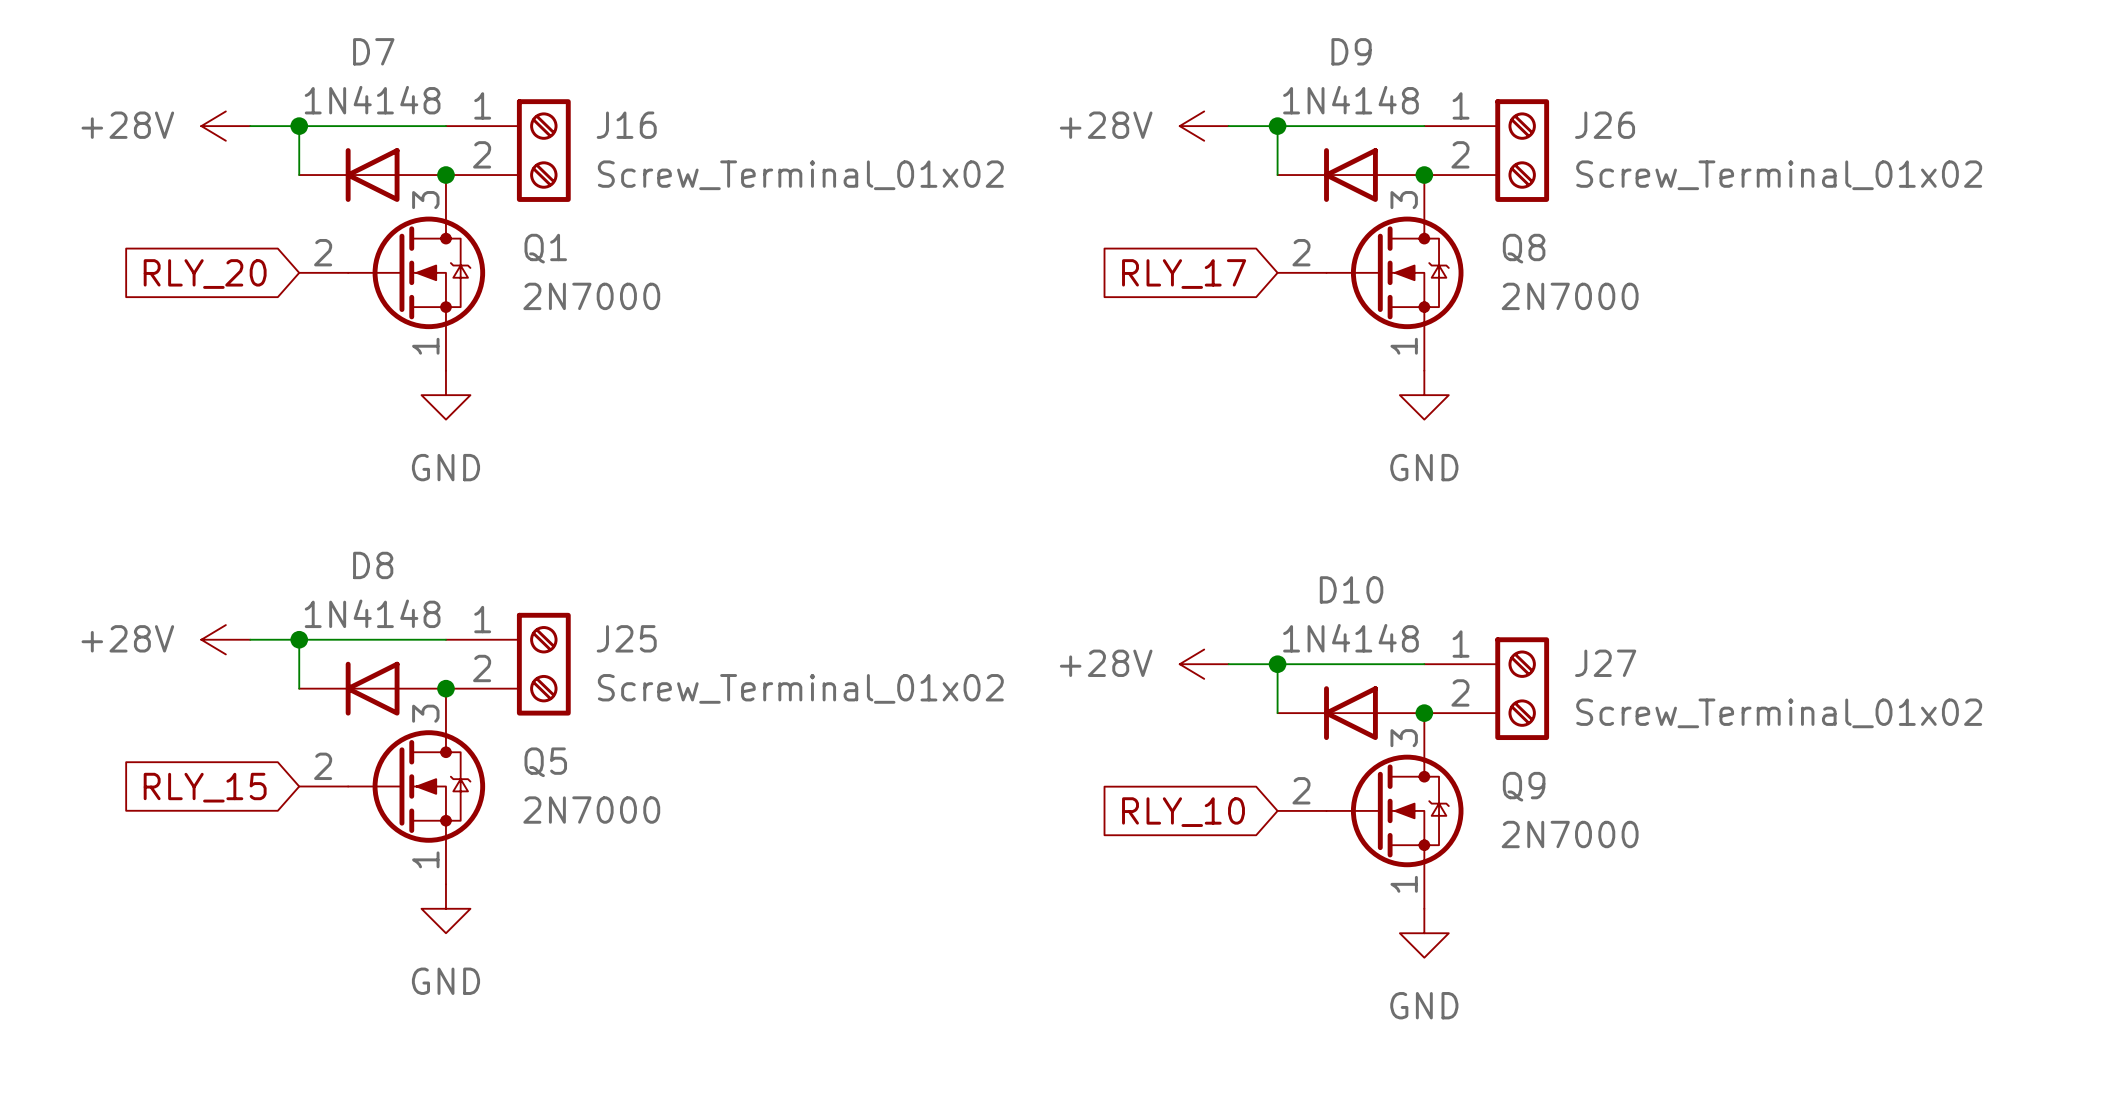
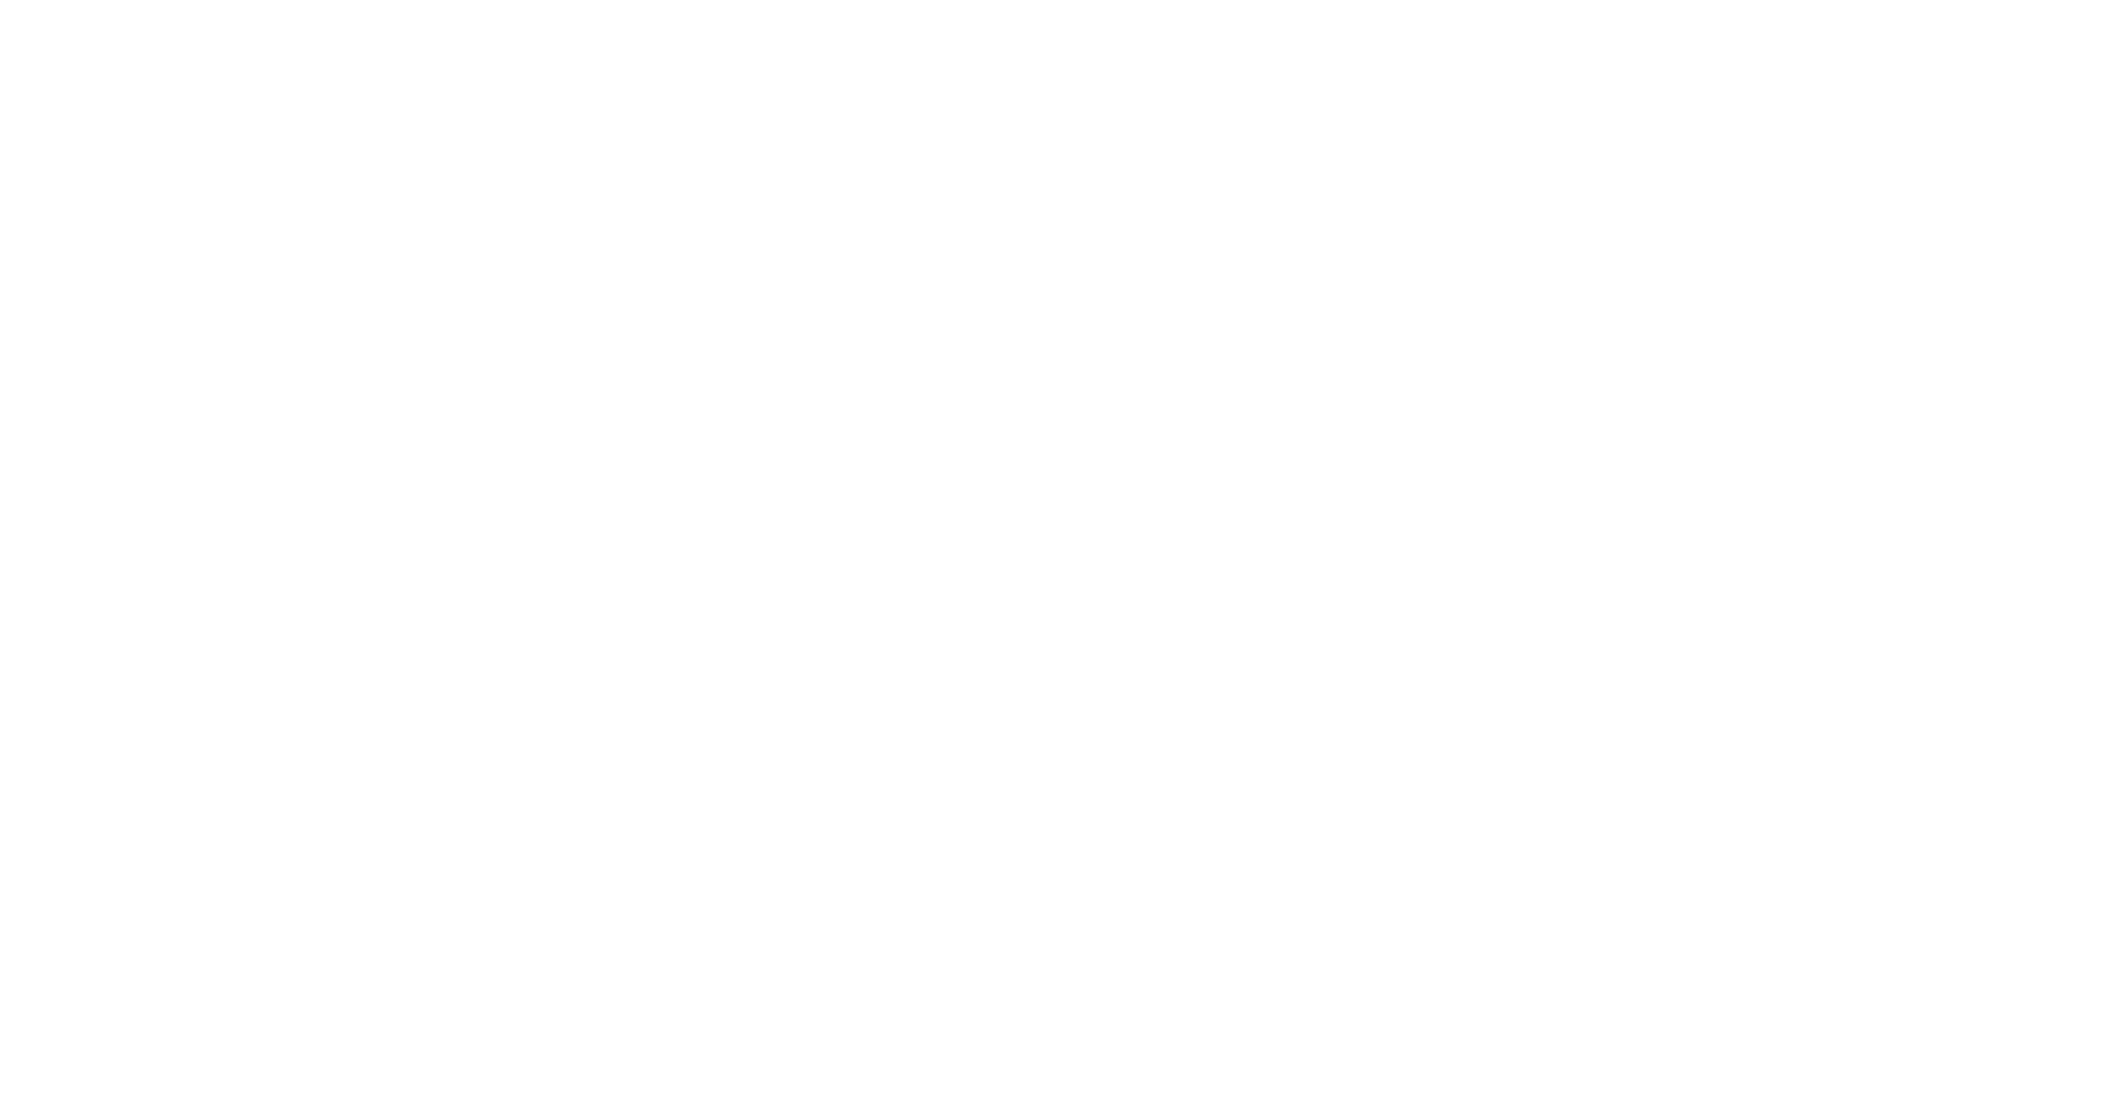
power symbol: +28V (225, 126) -> none
wire: (250, 126) (445, 126) -> none
wire: (299, 126) (299, 175) -> none
junction: (299, 126) -> none
power symbol: +28V (1204, 126) -> none
wire: (1228, 126) (1424, 126) -> none
wire: (1277, 126) (1277, 175) -> none
junction: (1277, 126) -> none
J16: Screw_Terminal_01x02 (508, 150) -> none
J26: Screw_Terminal_01x02 (1486, 150) -> none
D7: 1N4148 (372, 175) -> none
junction: (445, 175) -> none
D9: 1N4148 (1350, 175) -> none
junction: (1424, 175) -> none
Q1: 2N7000 (392, 272) -> none
Q8: 2N7000 (1370, 272) -> none
global label: RLY_20 (205, 274) -> none
global label: RLY_17 (1184, 274) -> none
power symbol: GND (445, 395) -> none
power symbol: GND (1424, 395) -> none
power symbol: +28V (225, 639) -> none
wire: (250, 639) (445, 639) -> none
wire: (299, 639) (299, 688) -> none
junction: (299, 639) -> none
J25: Screw_Terminal_01x02 (508, 664) -> none
power symbol: +28V (1204, 664) -> none
wire: (1228, 664) (1424, 664) -> none
wire: (1277, 664) (1277, 713) -> none
junction: (1277, 664) -> none
D8: 1N4148 (372, 688) -> none
junction: (445, 688) -> none
J27: Screw_Terminal_01x02 (1486, 688) -> none
D10: 1N4148 (1350, 713) -> none
junction: (1424, 713) -> none
Q5: 2N7000 (392, 786) -> none
global label: RLY_15 (205, 787) -> none
Q9: 2N7000 (1370, 810) -> none
global label: RLY_10 (1183, 812) -> none
power symbol: GND (445, 908) -> none
power symbol: GND (1424, 933) -> none

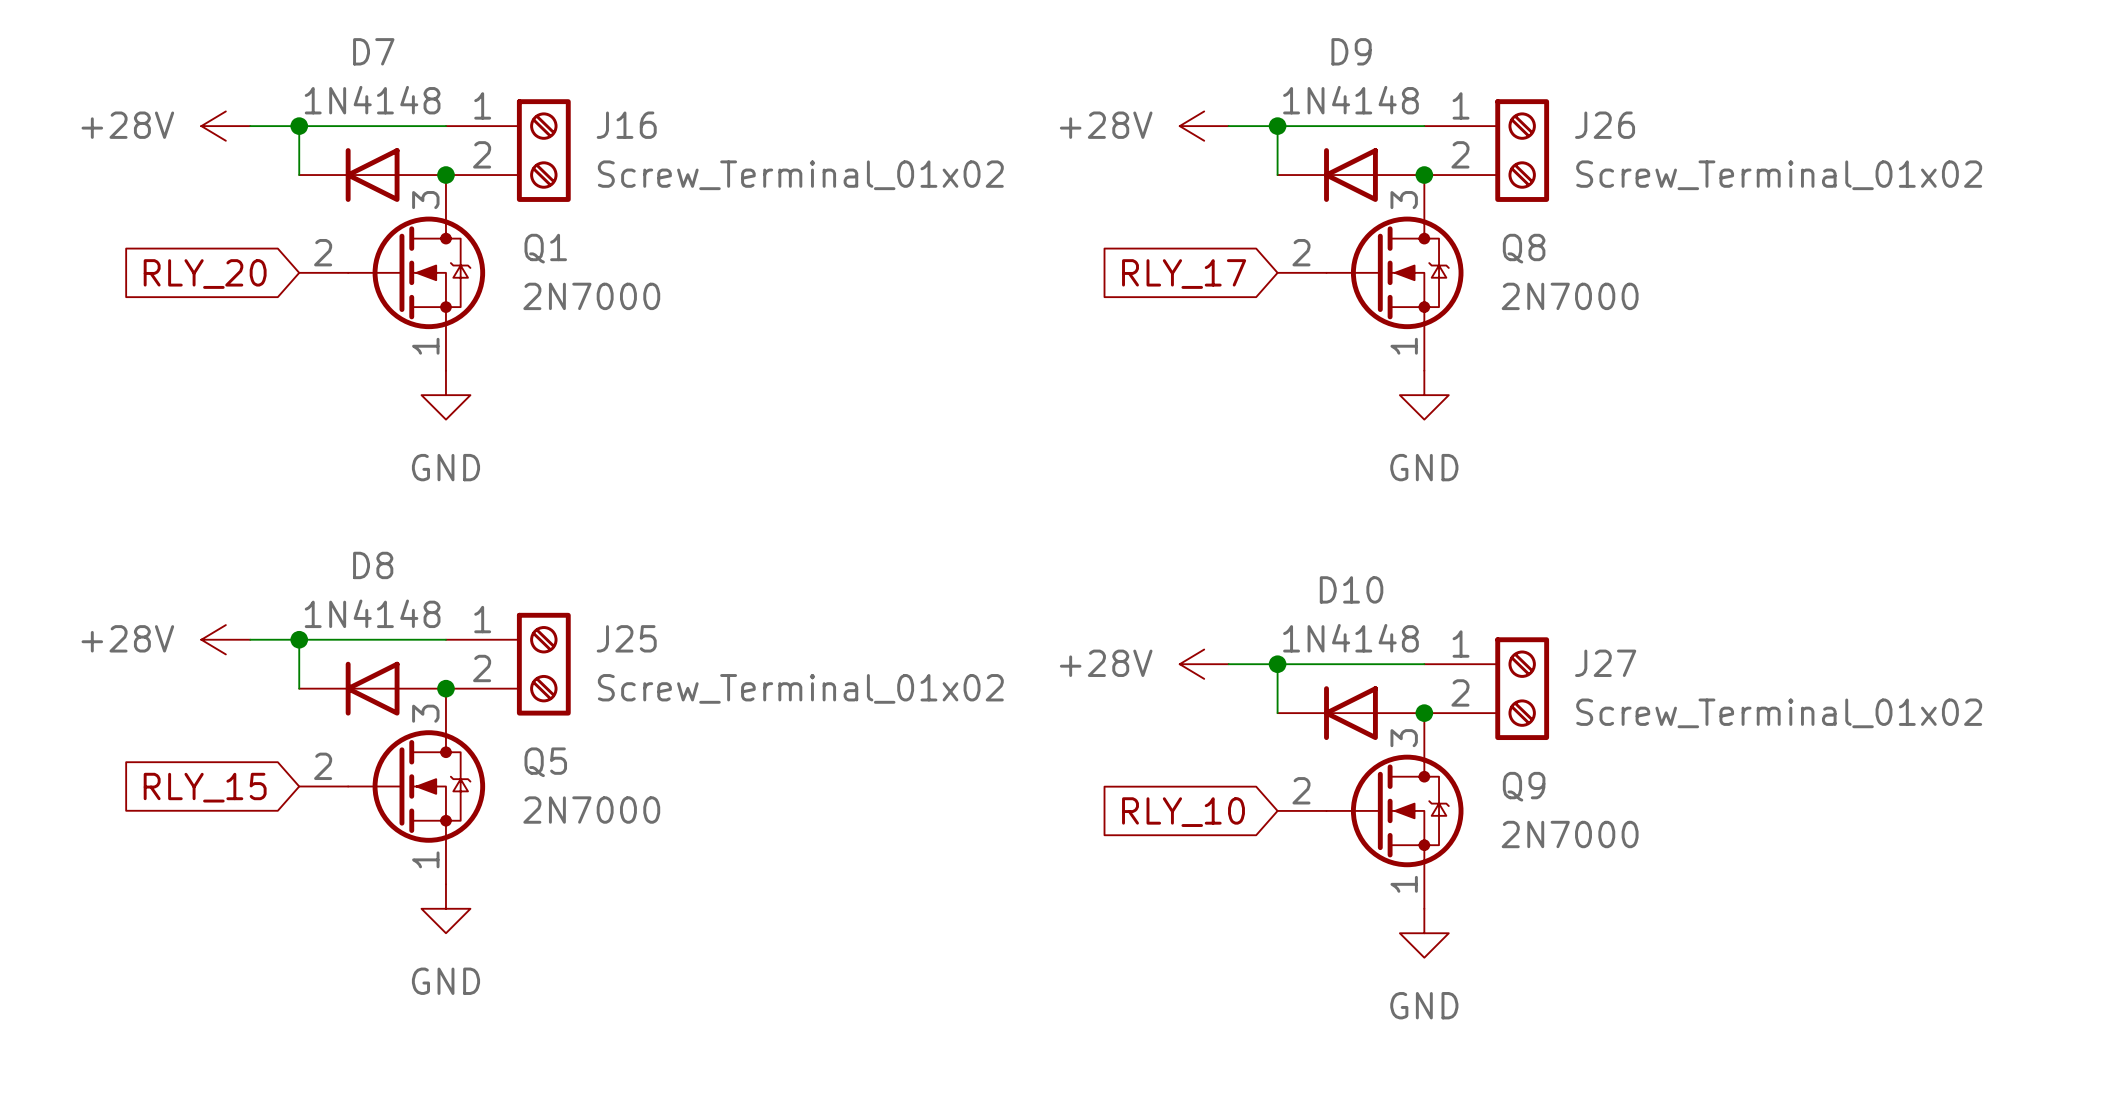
power symbol: none -> +28V (225, 126)
wire: none -> (250, 126) (445, 126)
wire: none -> (299, 126) (299, 175)
junction: none -> (299, 126)
power symbol: none -> +28V (1204, 126)
wire: none -> (1228, 126) (1424, 126)
wire: none -> (1277, 126) (1277, 175)
junction: none -> (1277, 126)
J16: none -> Screw_Terminal_01x02 (508, 150)
J26: none -> Screw_Terminal_01x02 (1486, 150)
D7: none -> 1N4148 (372, 175)
junction: none -> (445, 175)
D9: none -> 1N4148 (1350, 175)
junction: none -> (1424, 175)
Q1: none -> 2N7000 (392, 272)
Q8: none -> 2N7000 (1370, 272)
global label: none -> RLY_20 (205, 274)
global label: none -> RLY_17 (1184, 274)
power symbol: none -> GND (445, 395)
power symbol: none -> GND (1424, 395)
power symbol: none -> +28V (225, 639)
wire: none -> (250, 639) (445, 639)
wire: none -> (299, 639) (299, 688)
junction: none -> (299, 639)
J25: none -> Screw_Terminal_01x02 (508, 664)
power symbol: none -> +28V (1204, 664)
wire: none -> (1228, 664) (1424, 664)
wire: none -> (1277, 664) (1277, 713)
junction: none -> (1277, 664)
D8: none -> 1N4148 (372, 688)
junction: none -> (445, 688)
J27: none -> Screw_Terminal_01x02 (1486, 688)
D10: none -> 1N4148 (1350, 713)
junction: none -> (1424, 713)
Q5: none -> 2N7000 (392, 786)
global label: none -> RLY_15 (205, 787)
Q9: none -> 2N7000 (1370, 810)
global label: none -> RLY_10 (1183, 812)
power symbol: none -> GND (445, 908)
power symbol: none -> GND (1424, 933)

